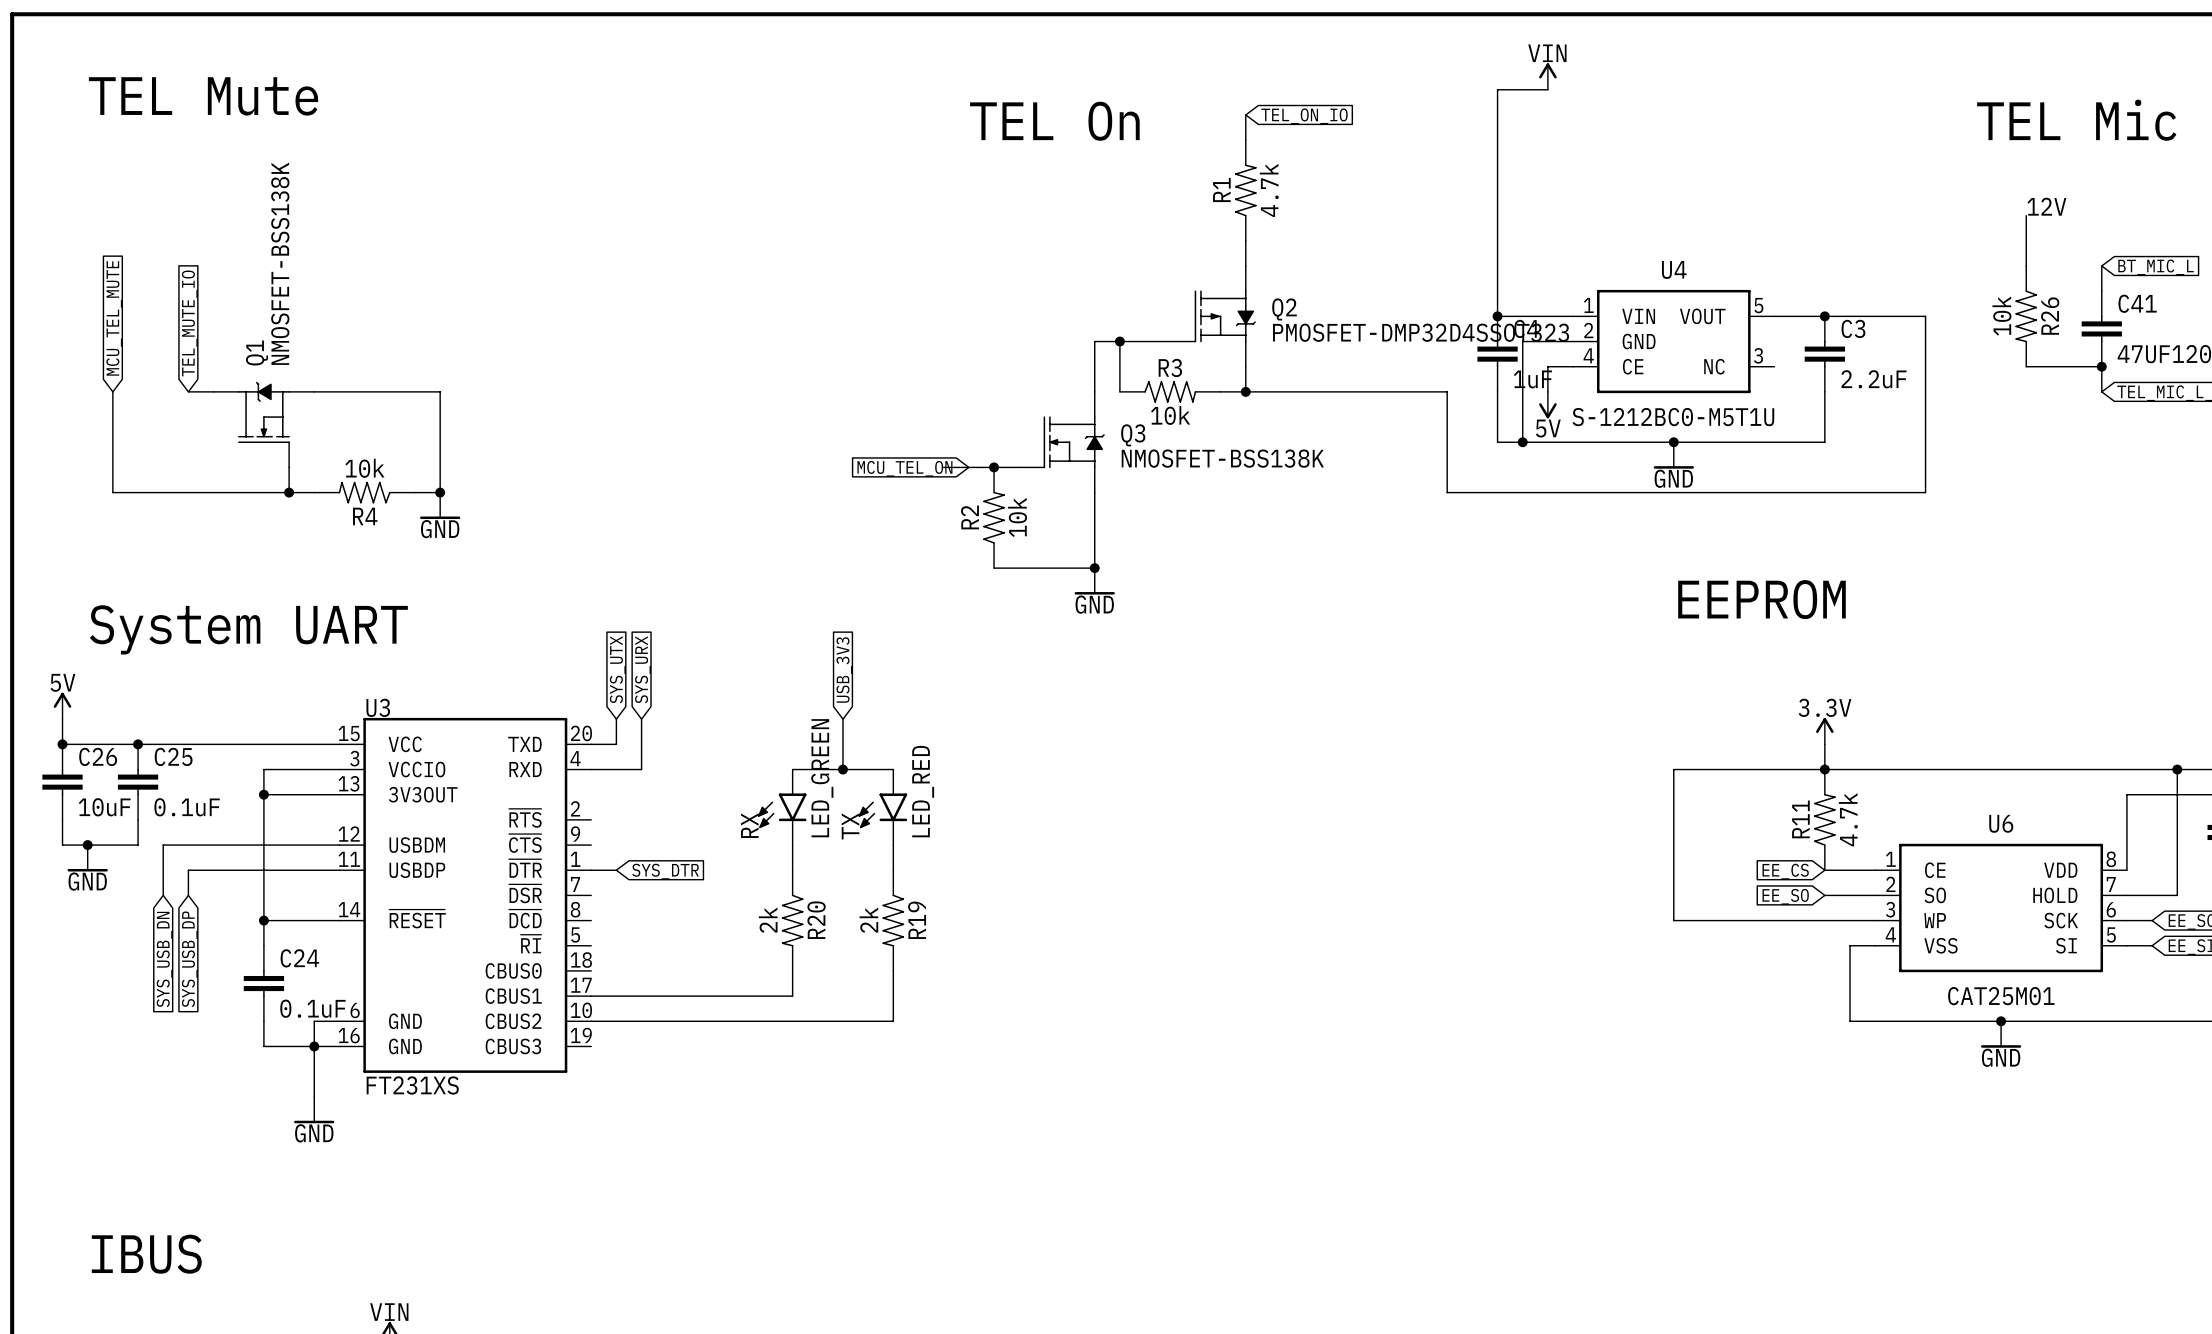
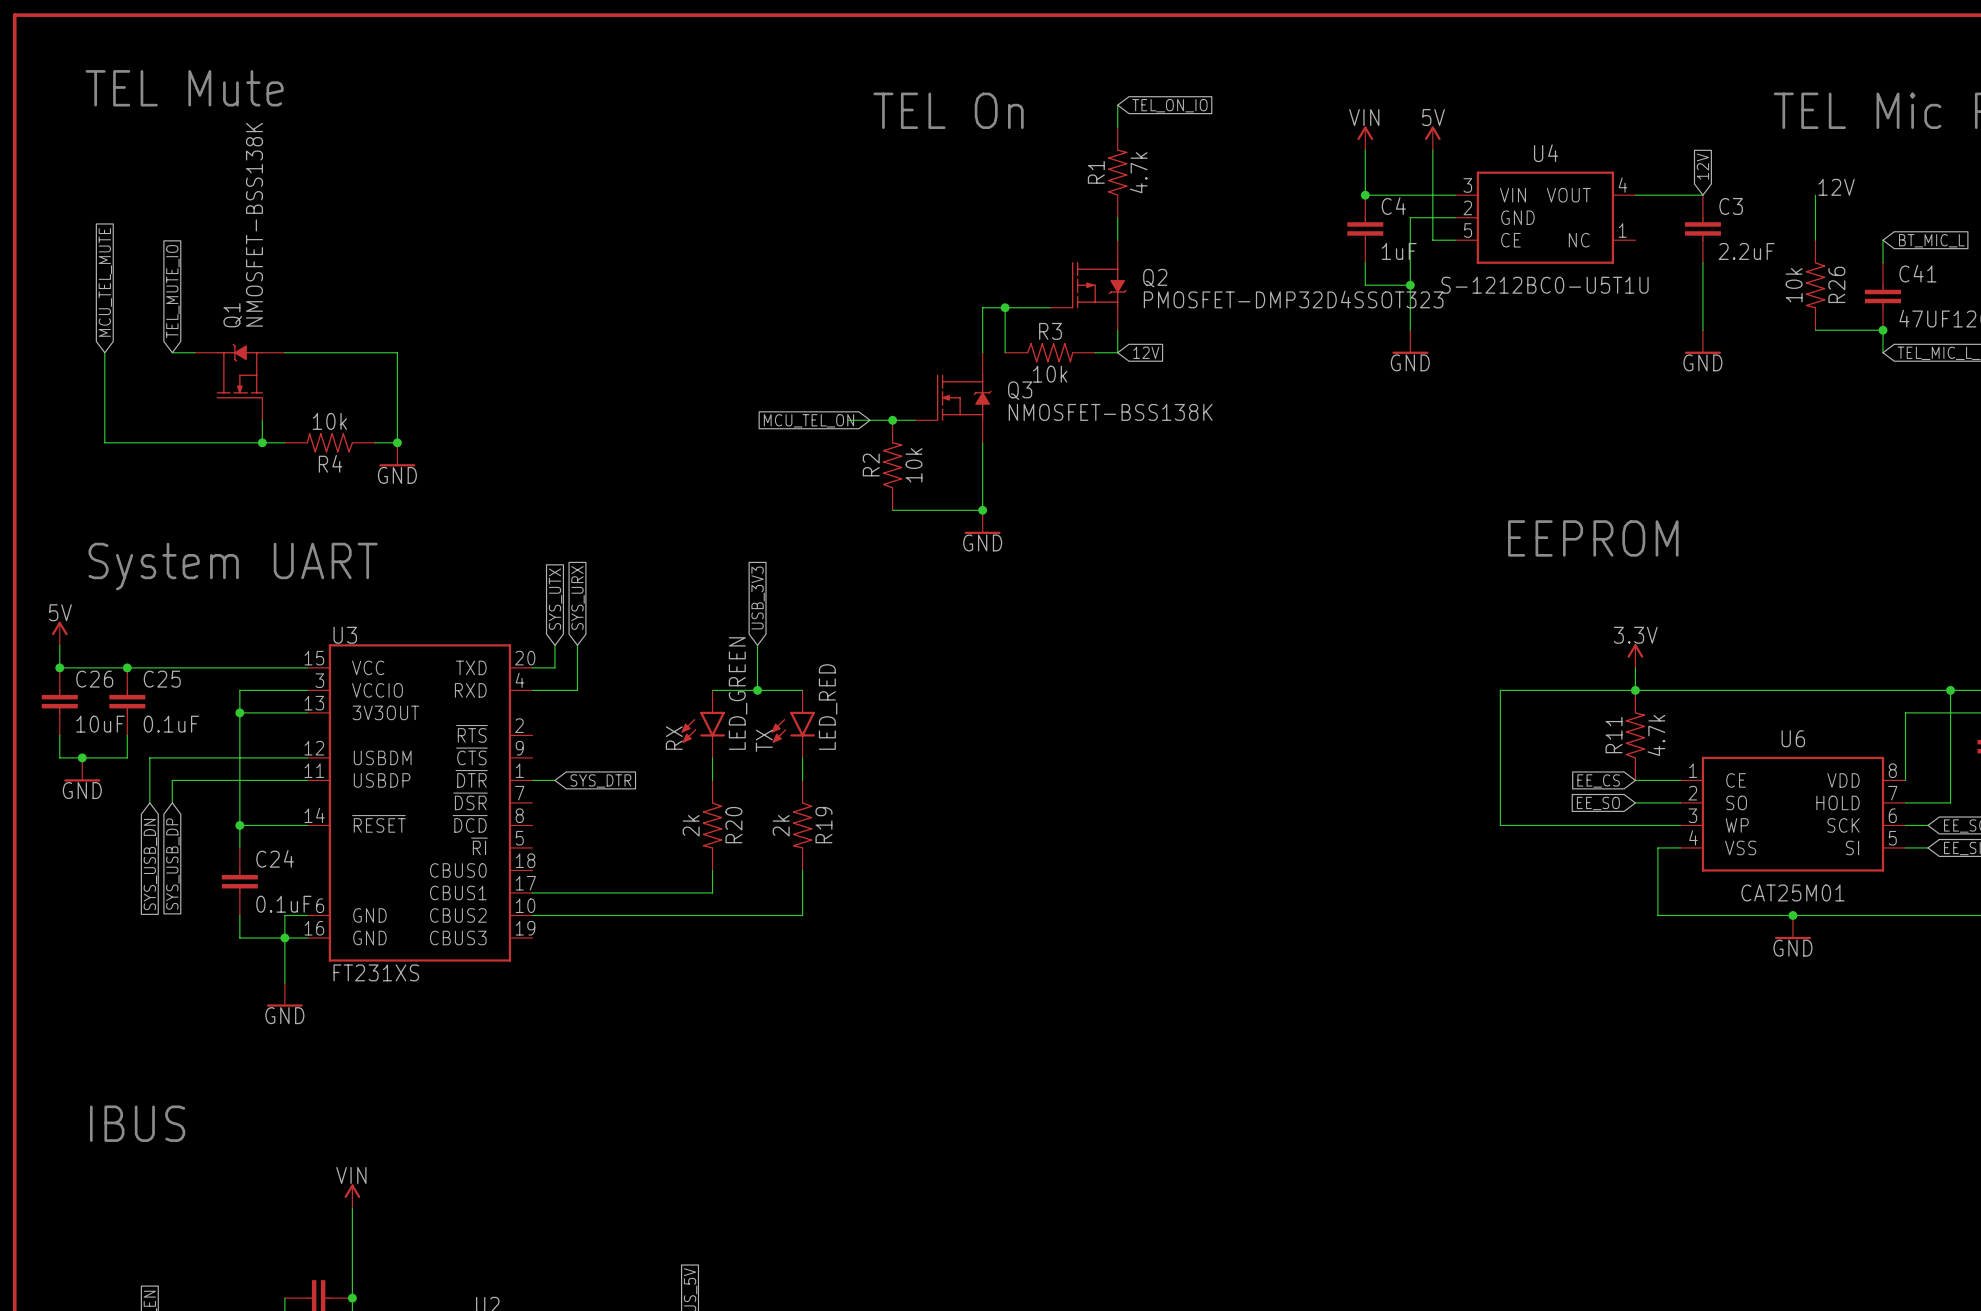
power symbol position: VIN (1547, 76) -> VIN (1365, 138)
wire: (1547, 89) (1497, 89) (1497, 316) (1522, 316) -> (1365, 262) (1365, 285)
power symbol: none -> 5V (1432, 138)
wire: none -> (1365, 150) (1365, 195) (1455, 195)
wire: none -> (1432, 150) (1432, 240) (1455, 240)
global label: none -> 12V (1702, 166)
junction: none -> (1365, 195)
wire: none -> (1635, 195) (1702, 195)
wire: none -> (1702, 262) (1702, 330)
U4 pin number: 1 (1588, 305) -> 3 (1467, 185)
U4 pin number: 5 (1758, 305) -> 4 (1622, 185)
junction: (1497, 316) -> none
junction: none -> (1410, 285)
wire: (1774, 316) (1925, 316) (1925, 492) (1447, 492) (1447, 391) (1245, 391) -> none
junction: (1824, 316) -> none
wire: (1573, 341) (1522, 341) (1522, 442) -> none
U4 position: (1673, 341) -> (1545, 217)
C4 position: (1497, 354) -> (1365, 228)
C3 position: (1824, 354) -> (1702, 228)
U4 pin number: 4 (1588, 355) -> 5 (1468, 230)
U4 pin number: 3 (1758, 355) -> 1 (1622, 230)
wire: (1573, 366) (1547, 366) (1547, 391) -> (1410, 330) (1410, 217) (1455, 217)
power symbol: none -> GND (1410, 342)
power symbol: none -> GND (1702, 342)
junction: (1245, 391) -> none
global label: none -> 12V (1146, 352)
wire: (1497, 391) (1497, 442) (1824, 442) (1824, 391) -> none
power symbol: 5V (1547, 405) -> none
U4 value: S-1212BC0-M5T1U (1673, 417) -> S-1212BC0-U5T1U (1545, 285)
junction: (1522, 442) -> none
junction: (1673, 442) -> none
power symbol: GND (1673, 455) -> none

